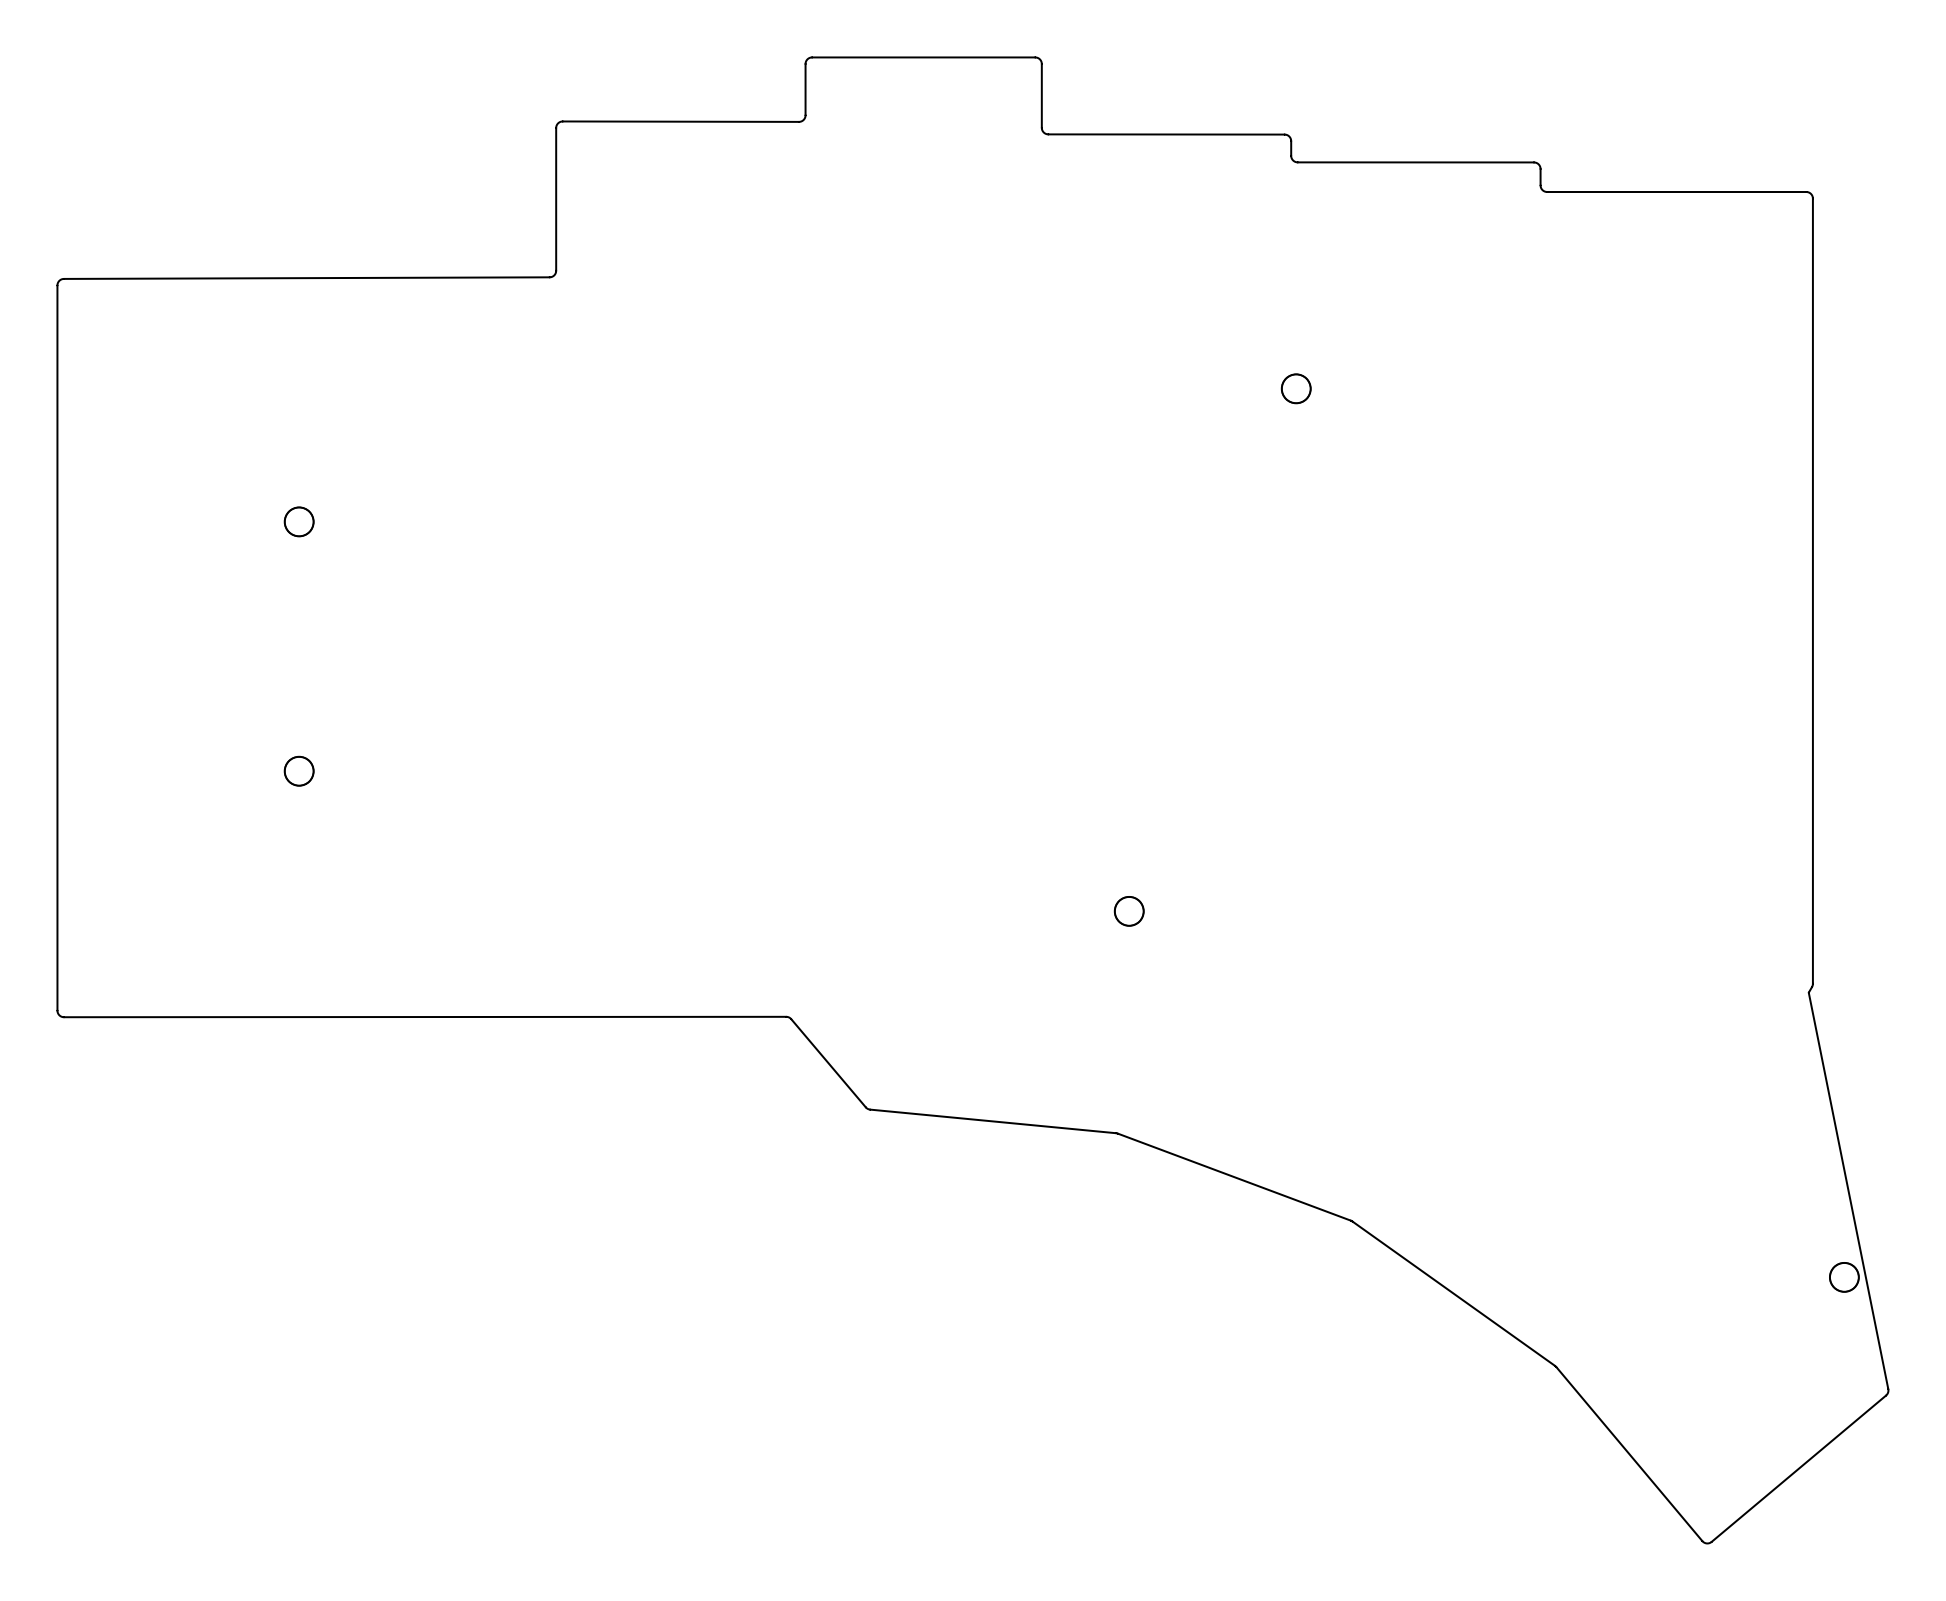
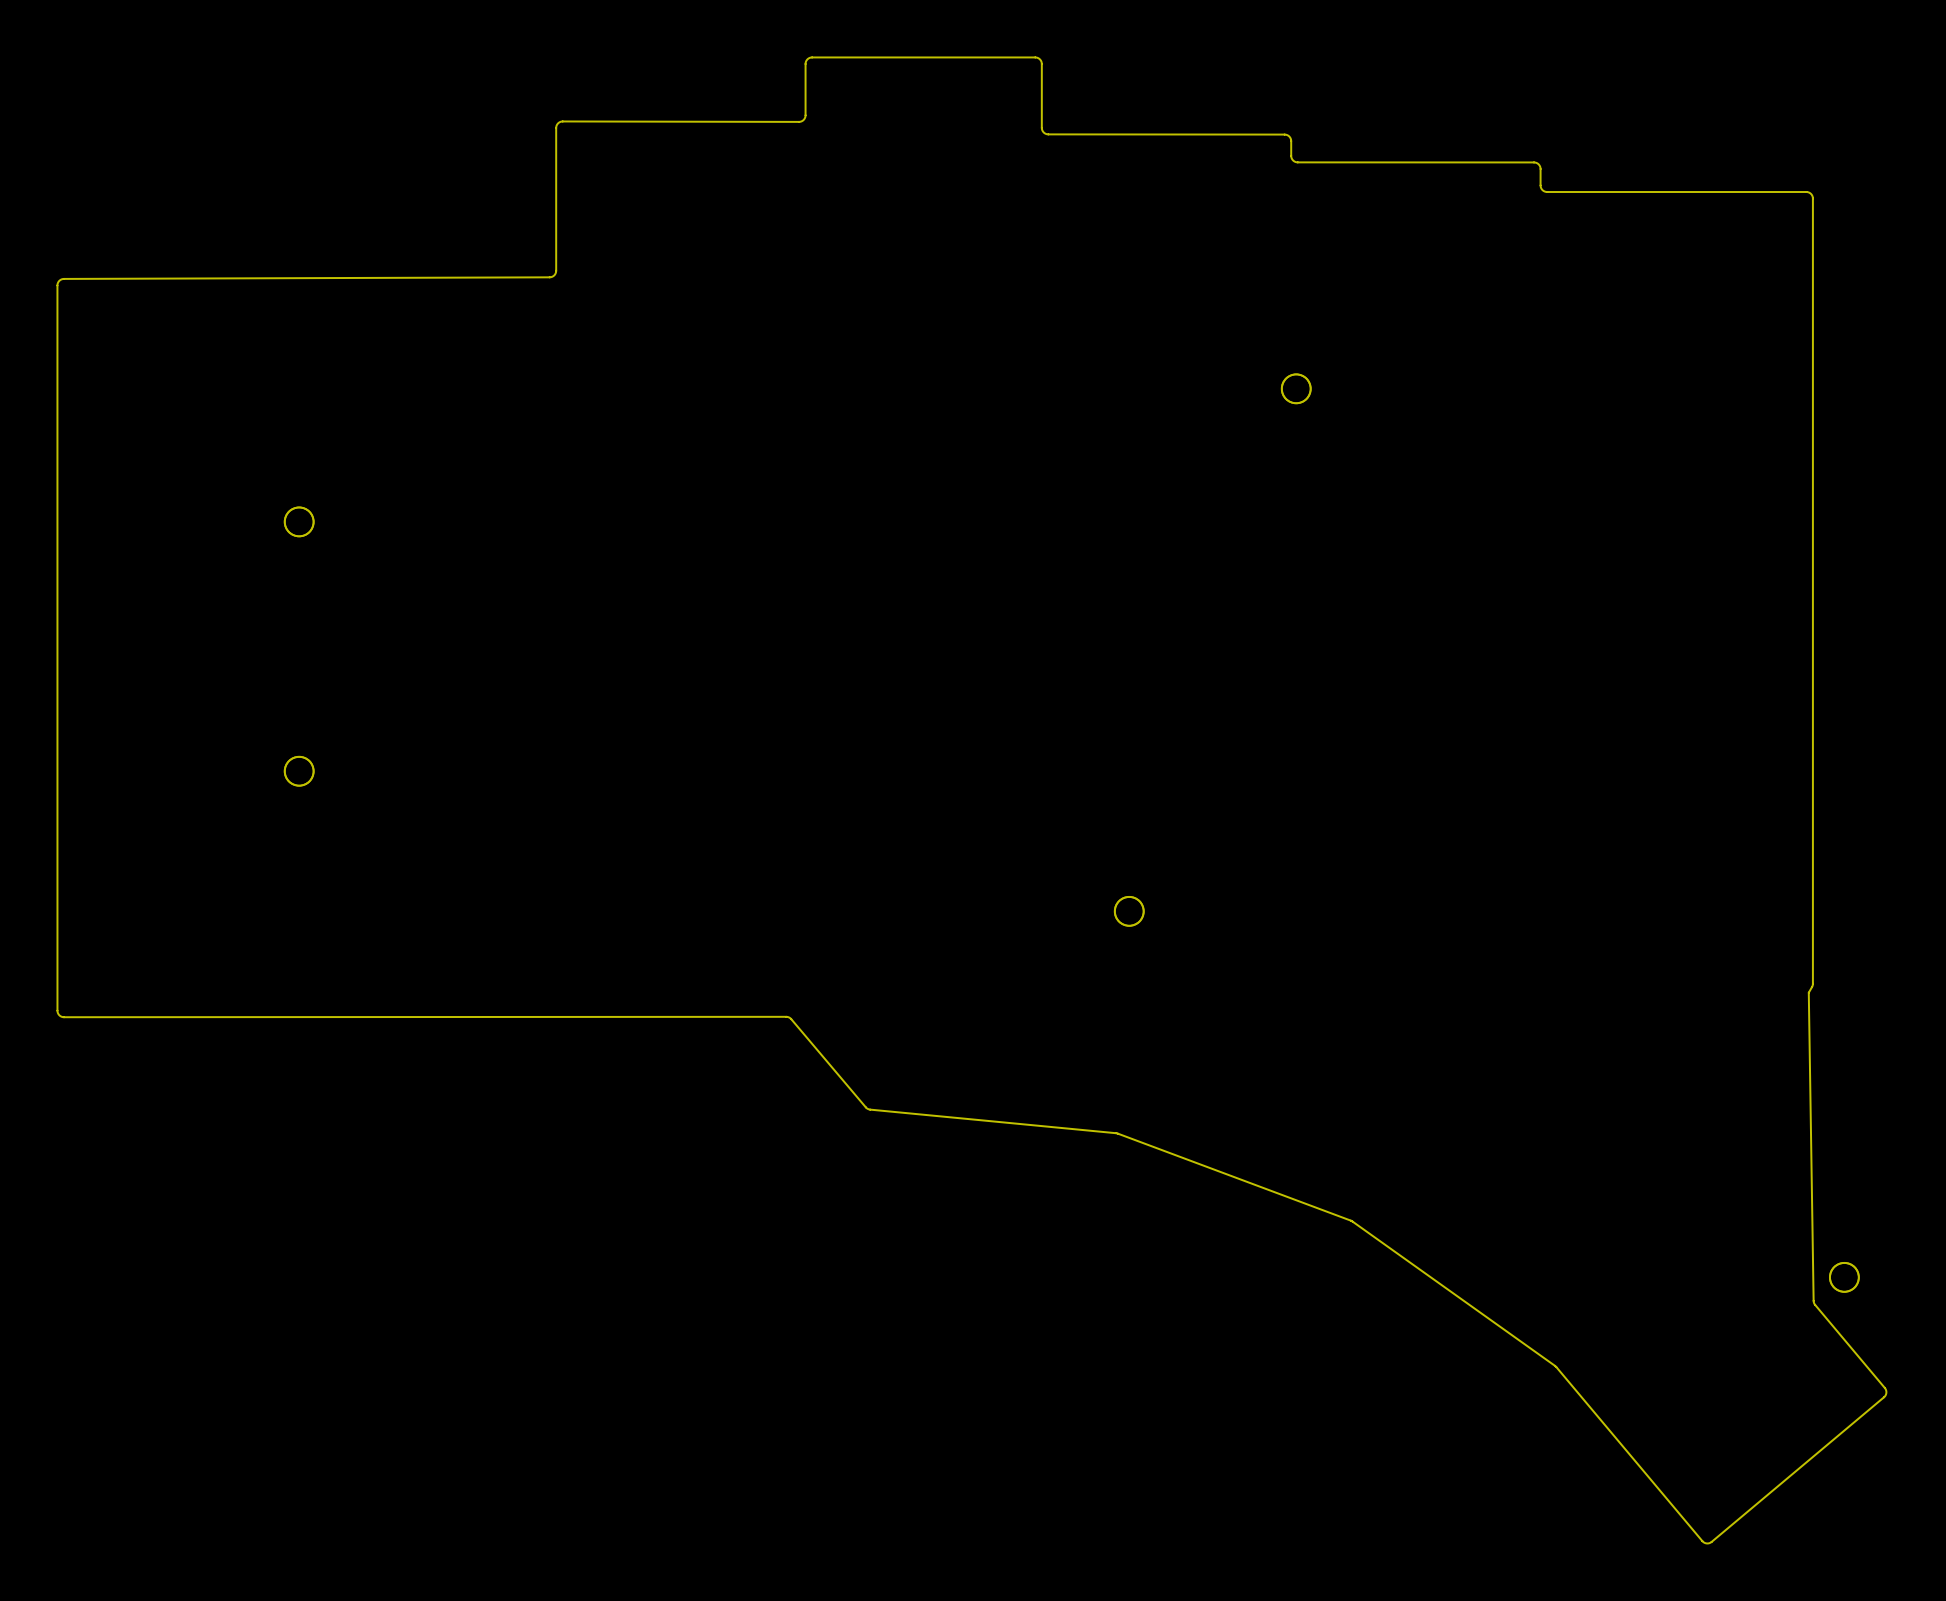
board edge: (1808, 992) (1888, 1389) (1884, 1397) -> (1808, 992) (1813, 1301) (1885, 1388) (1886, 1393) (1884, 1397)

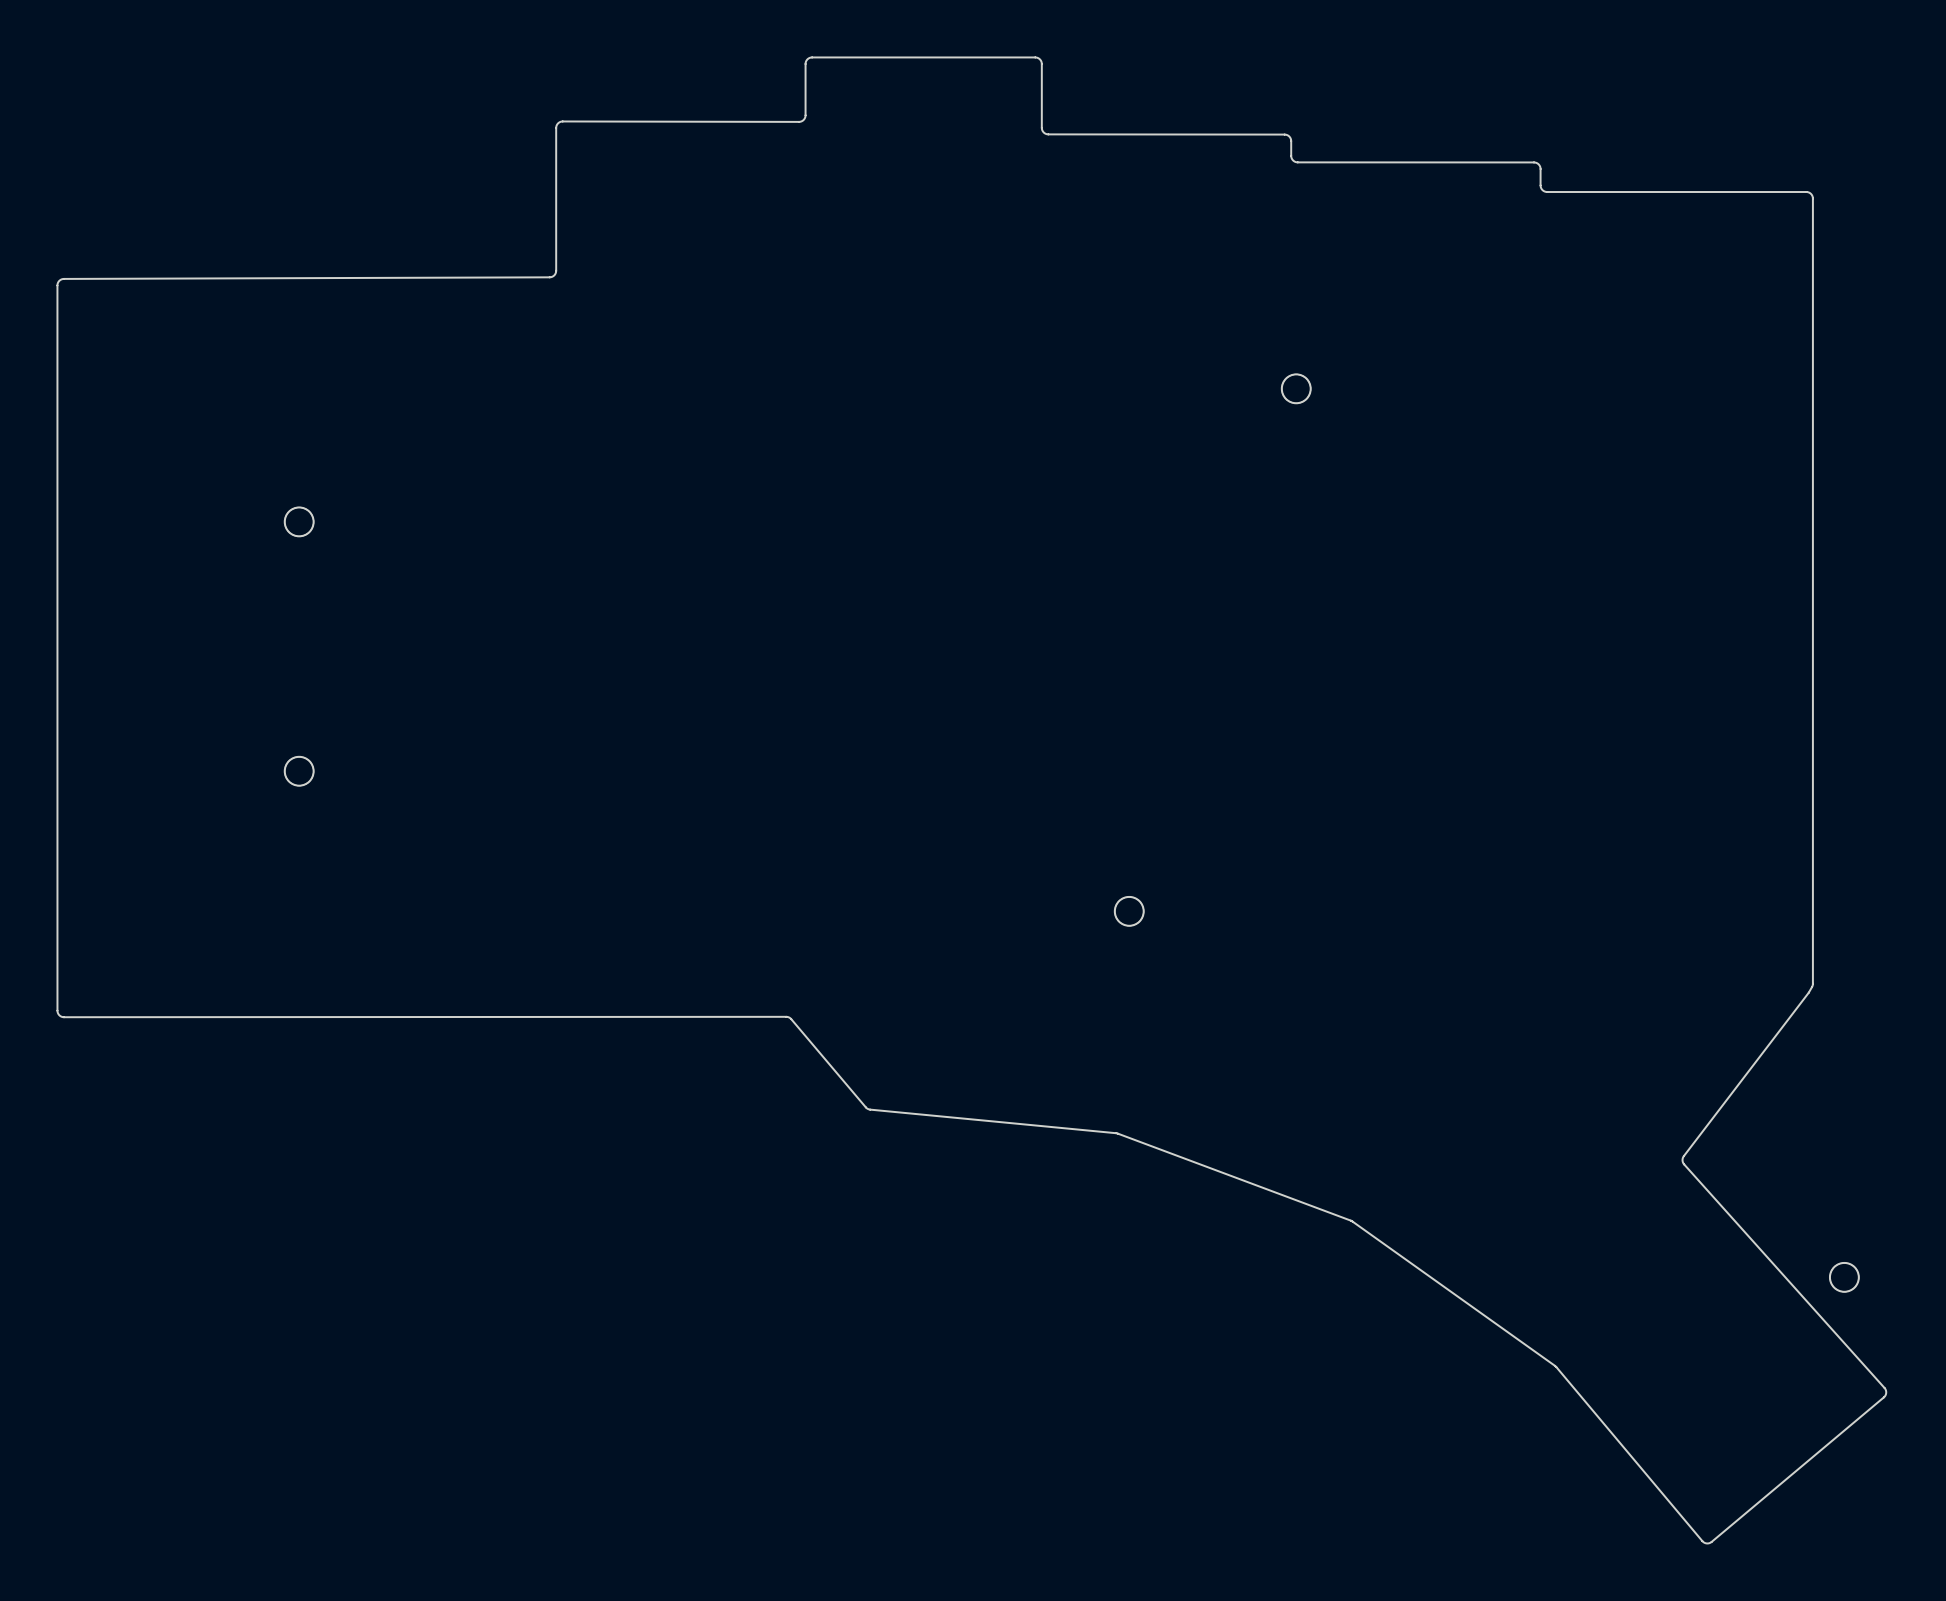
board edge: (1808, 992) (1813, 1301) (1885, 1388) (1886, 1393) (1884, 1397) -> (1808, 992) (1683, 1156) (1682, 1161) (1884, 1387) (1886, 1392) (1883, 1397)

